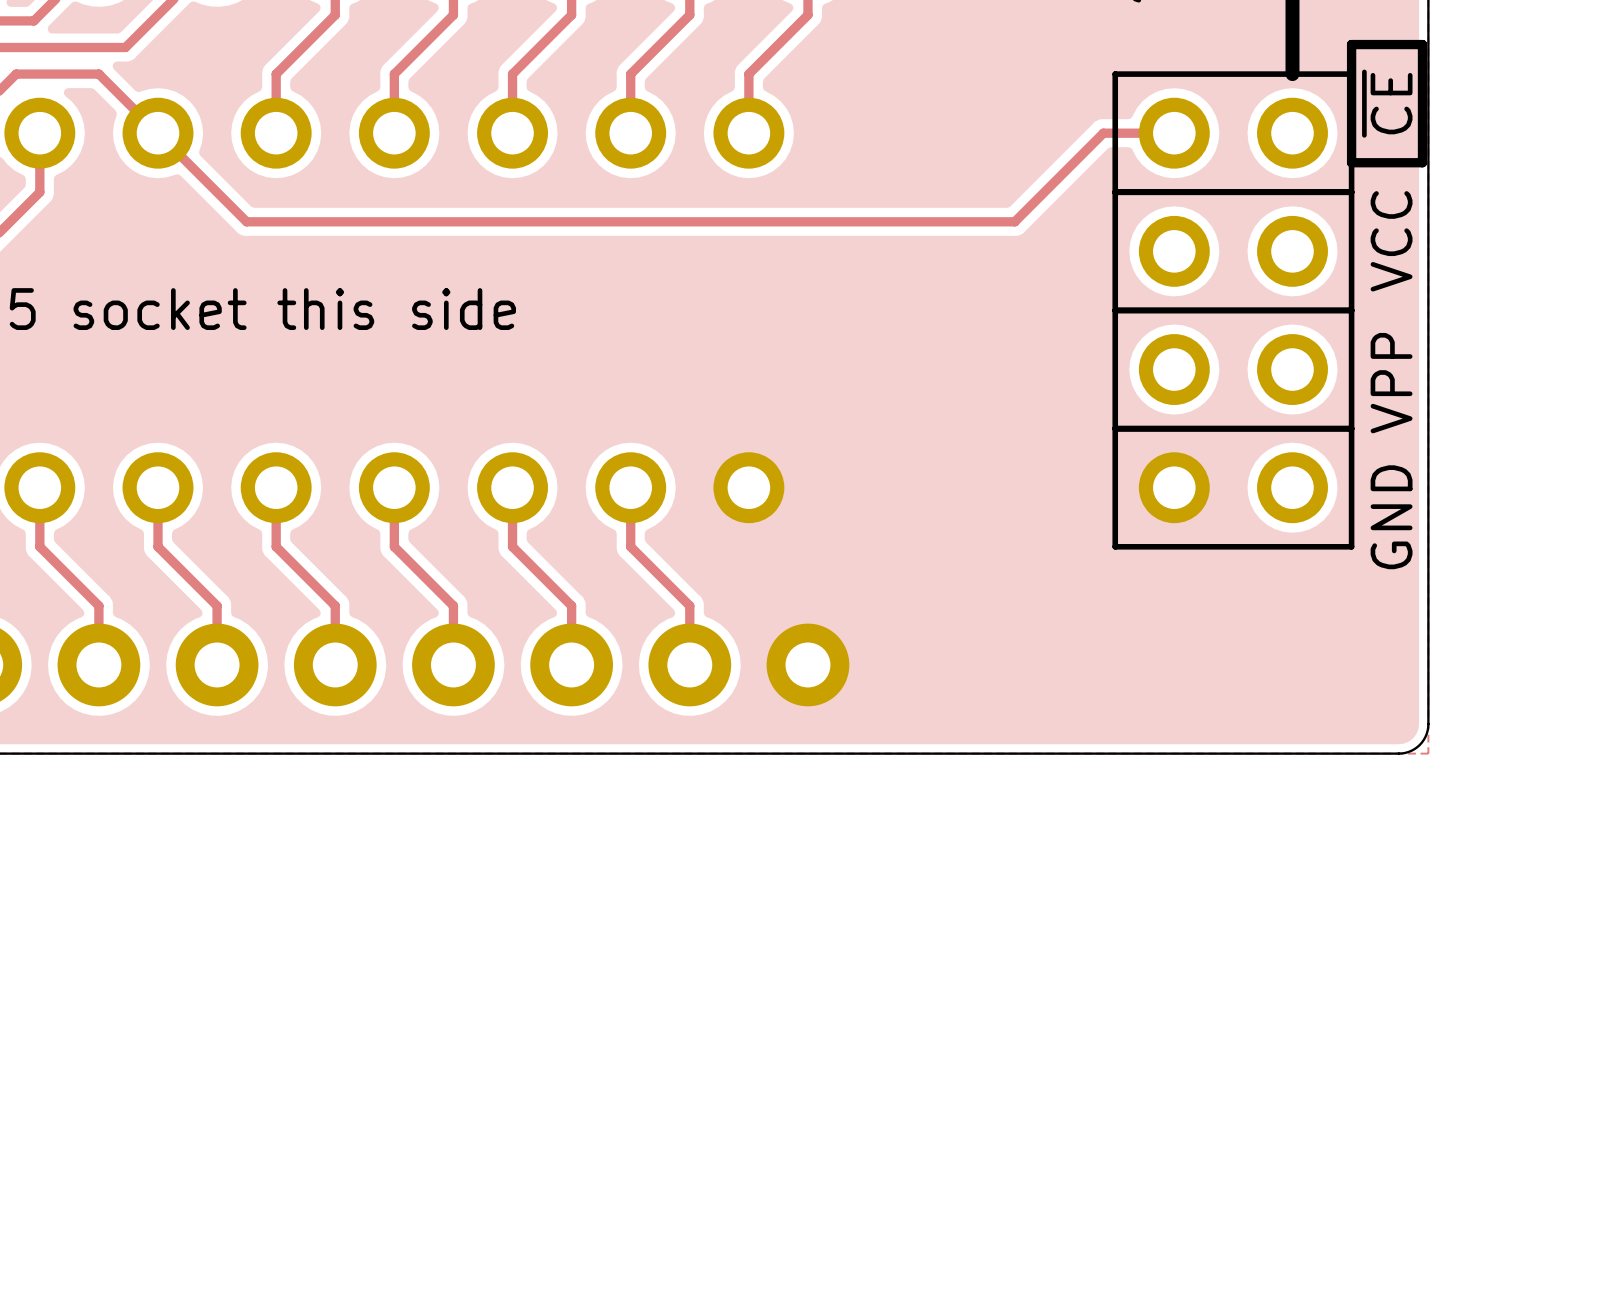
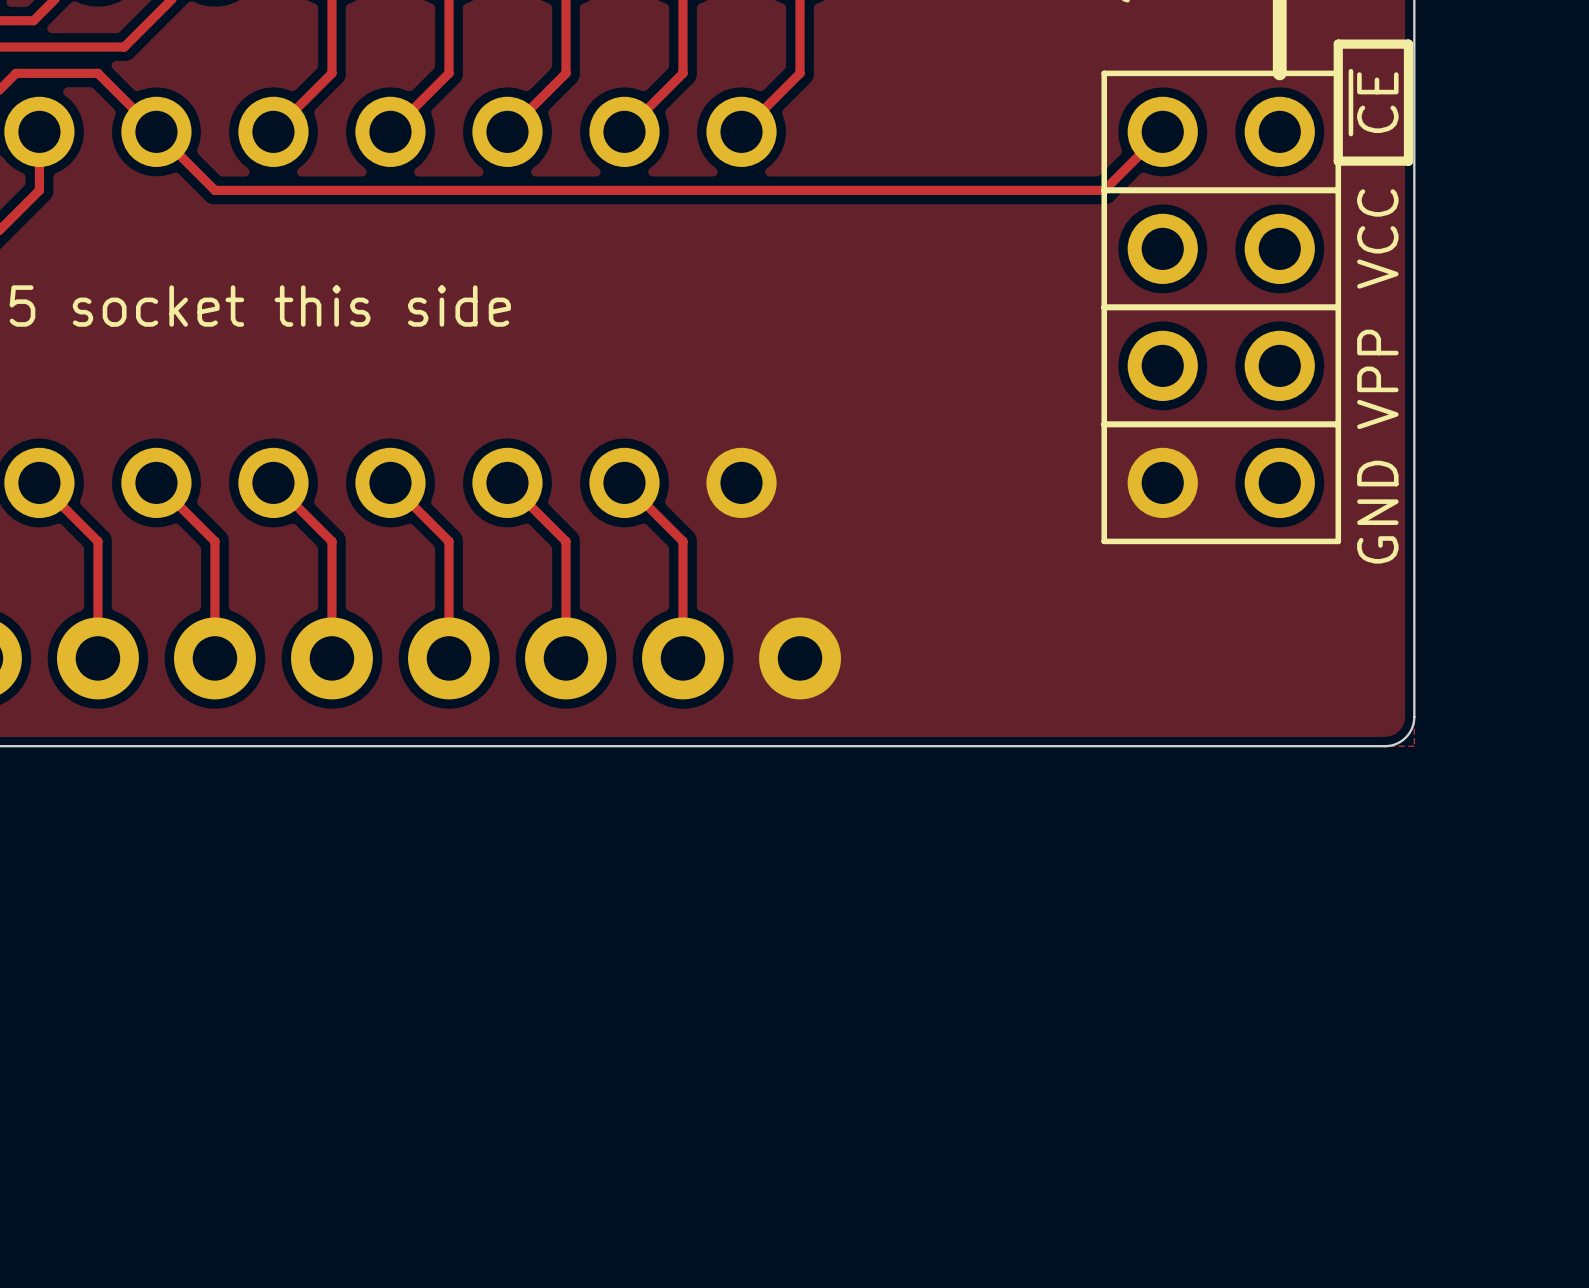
track: (335, 15) (276, 74) (276, 133) -> (331, 14) (331, 73) (273, 131)
track: (453, 15) (394, 74) (394, 133) -> (448, 14) (448, 73) (390, 131)
track: (571, 15) (512, 74) (512, 133) -> (565, 14) (565, 73) (507, 131)
track: (689, 15) (630, 74) (630, 133) -> (683, 14) (683, 73) (624, 131)
track: (807, 15) (748, 74) (748, 133) -> (800, 14) (800, 73) (741, 131)
track: (1174, 133) (1103, 133) (1014, 221) (246, 221) (217, 192) -> (1162, 131) (1104, 190) (214, 190)
track: (39, 487) (39, 546) (98, 605) -> (39, 482) (97, 541) (97, 599)
track: (158, 487) (158, 546) (217, 605) -> (156, 482) (214, 541) (214, 599)
track: (276, 487) (276, 546) (335, 605) -> (273, 482) (331, 541) (331, 599)
track: (394, 487) (394, 546) (453, 605) -> (390, 482) (448, 541) (448, 599)
track: (512, 487) (512, 546) (571, 605) -> (507, 482) (565, 541) (565, 599)
track: (630, 487) (630, 546) (689, 605) -> (624, 482) (683, 541) (683, 599)

